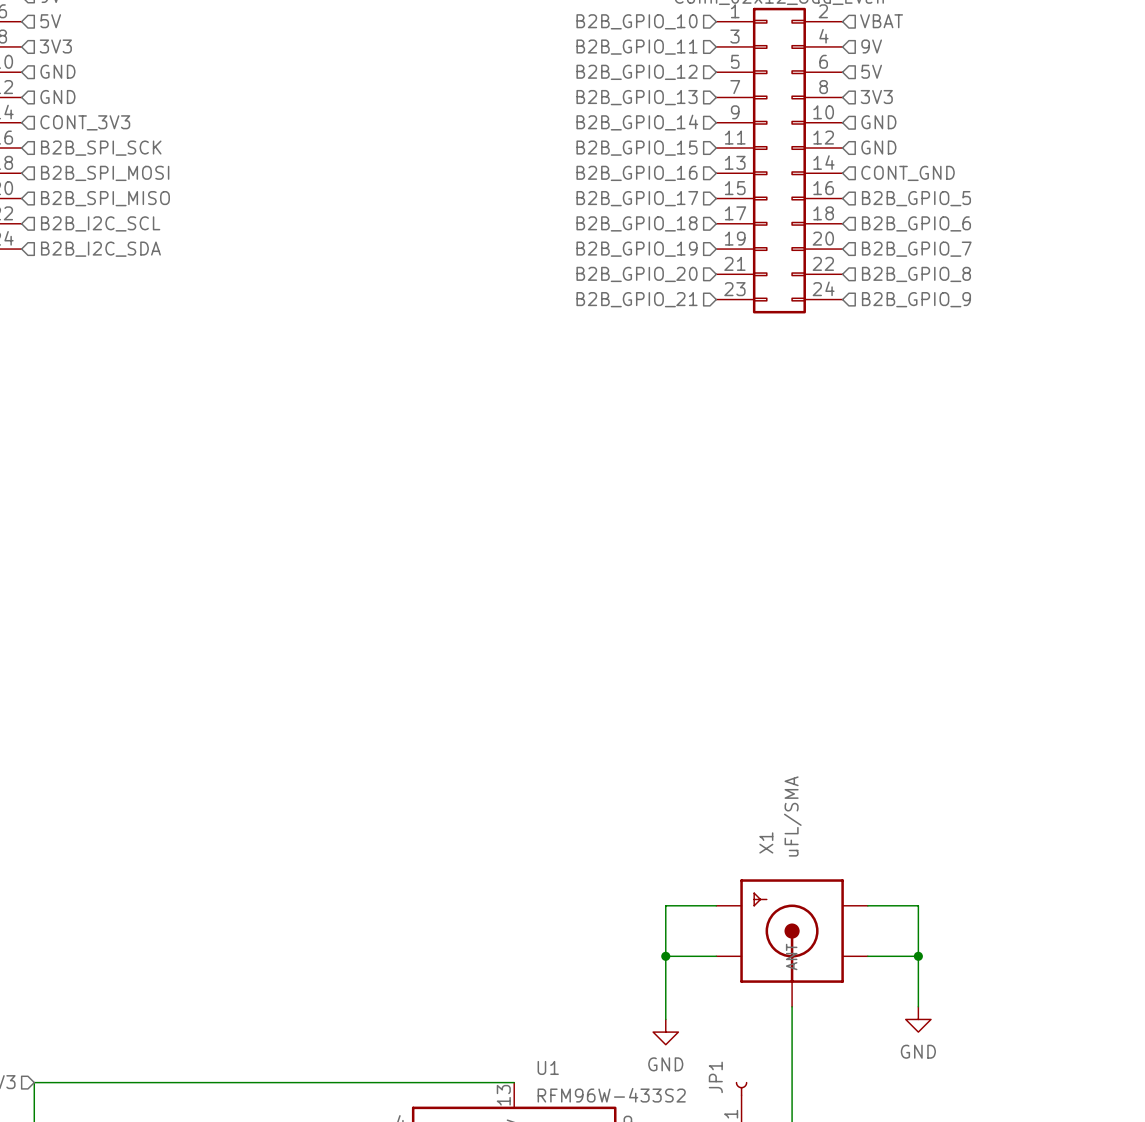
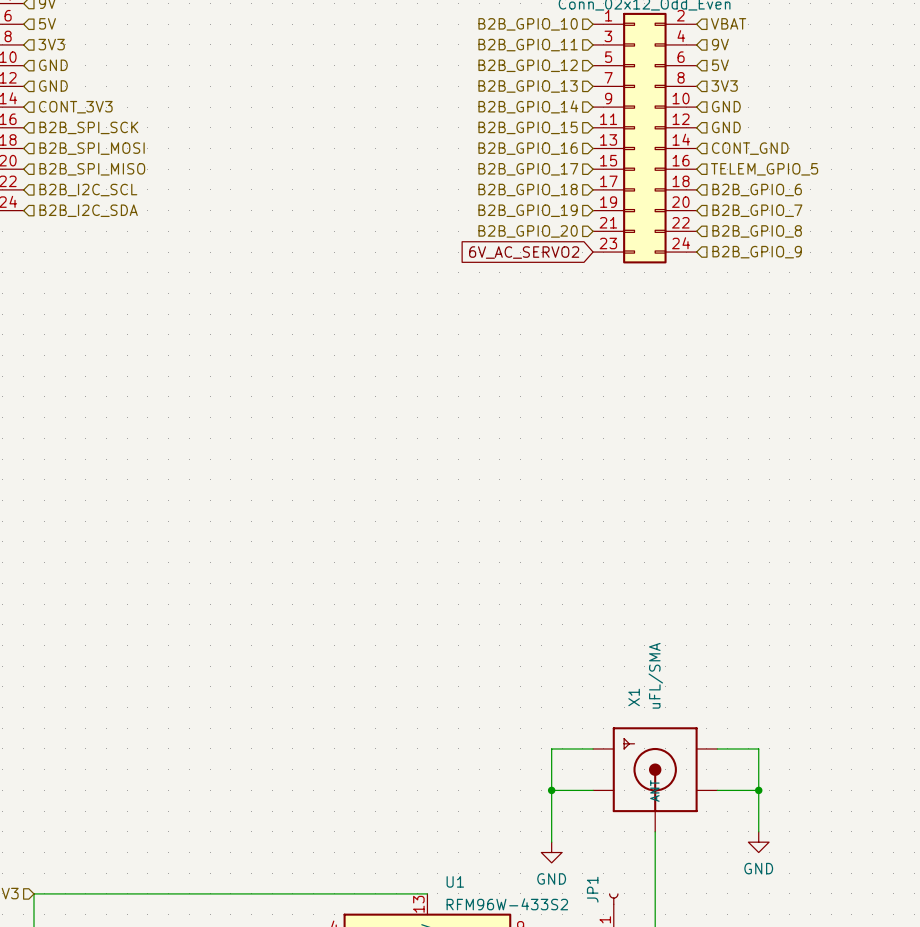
hierarchical label: B2B_GPIO_5 (916, 198) -> TELEM_GPIO_5 (764, 169)
hierarchical label: B2B_GPIO_21 (637, 299) -> none
global label: none -> 6V_AC_SERVO2 (524, 252)

